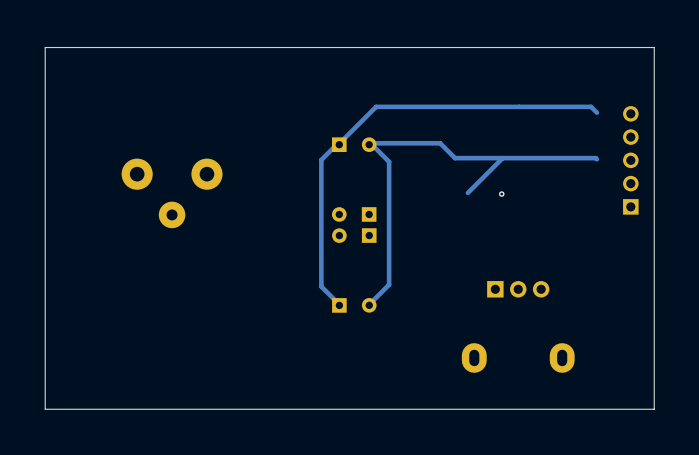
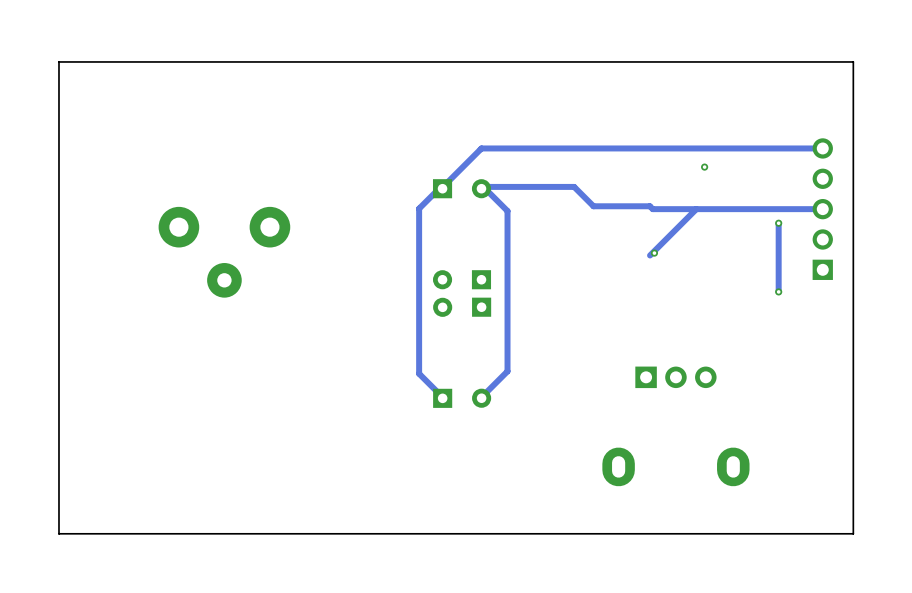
track: (596, 112) (591, 106) (376, 106) (369, 113) -> (822, 148) (481, 148)
via: none -> (704, 167)
track: (498, 158) (596, 159) -> (649, 206) (652, 209) (822, 209)
track: (502, 158) (467, 192) -> none
track: none -> (696, 209) (650, 255)
track: none -> (778, 223) (778, 291)
via: none -> (778, 223)
via: none -> (778, 291)

